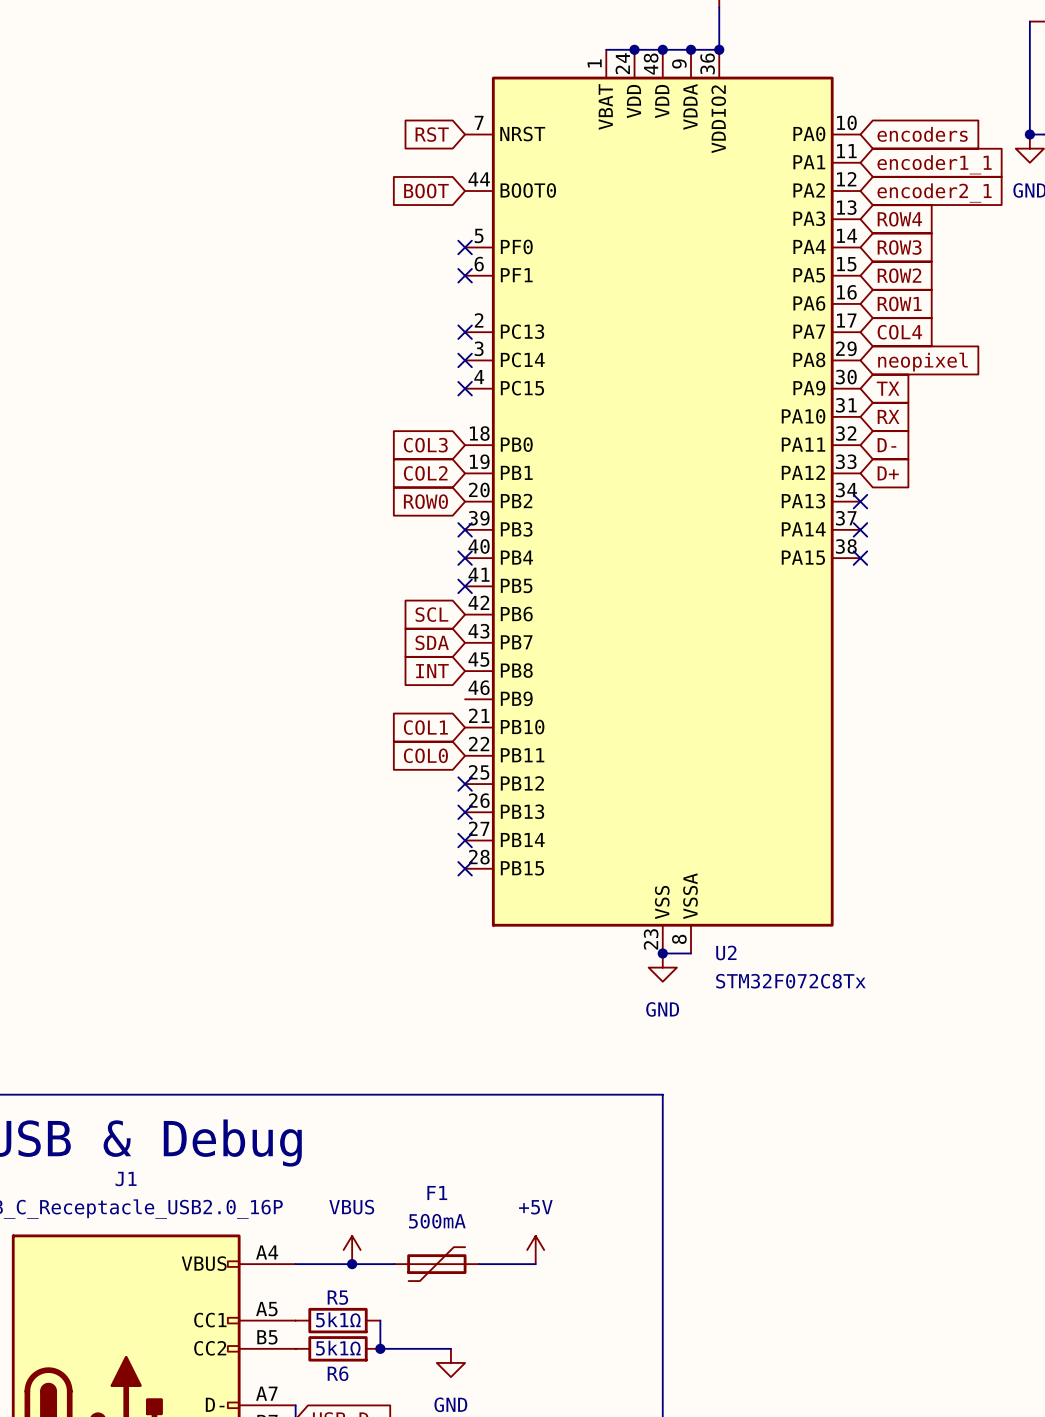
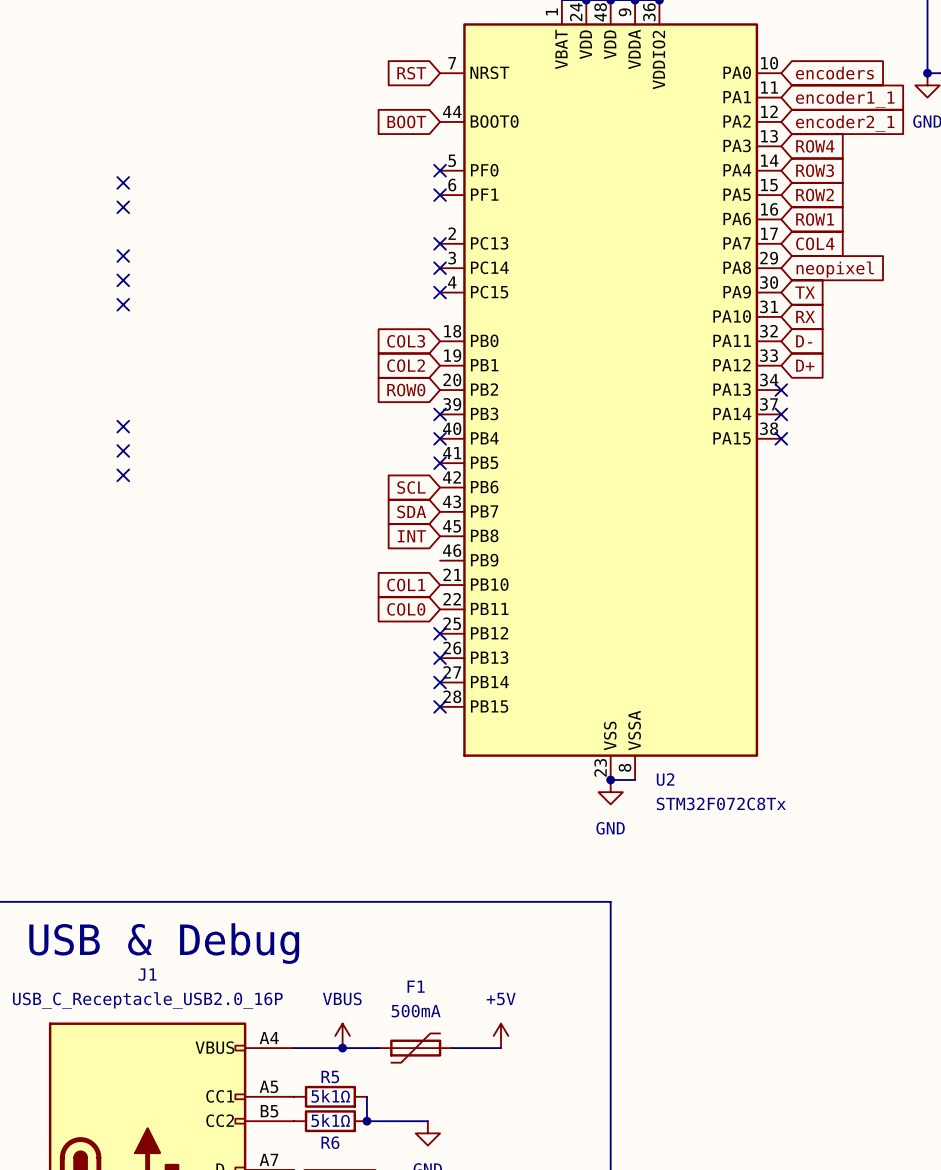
no-connect mark: none -> (123, 182)
no-connect mark: none -> (123, 207)
no-connect mark: none -> (123, 256)
no-connect mark: none -> (123, 280)
no-connect mark: none -> (123, 304)
no-connect mark: none -> (123, 426)
no-connect mark: none -> (123, 450)
no-connect mark: none -> (123, 475)

